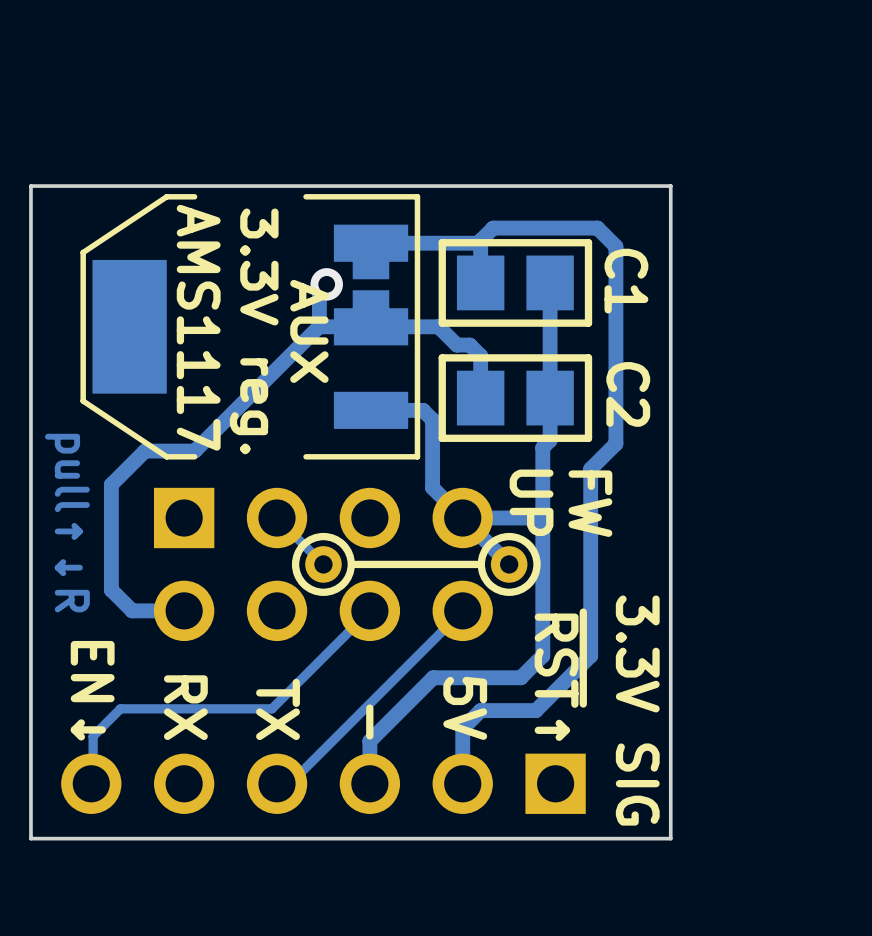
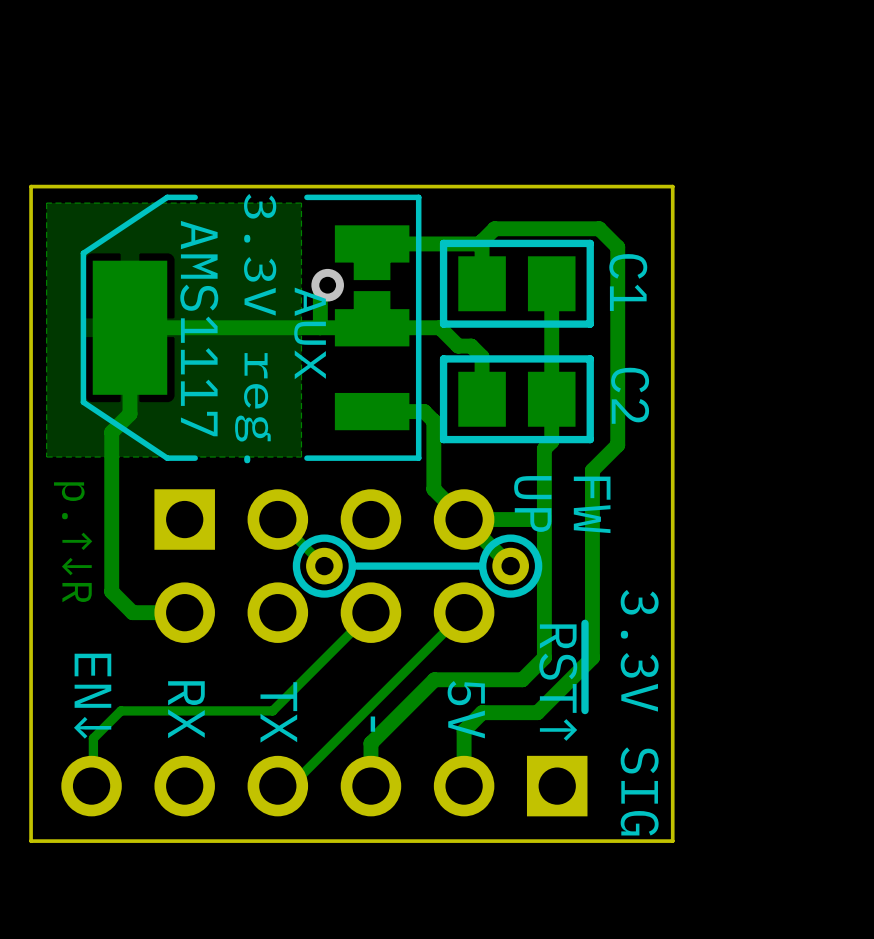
zone outline: none -> (301, 203) (301, 457) (46, 457) (46, 203) (301, 203)
track: (319, 326) (194, 451) (144, 451) (111, 484) -> (319, 327) (129, 327) (129, 414) (111, 432) (111, 486)
text: pull↑↓R (67, 523) -> p.↑↓R (73, 542)

